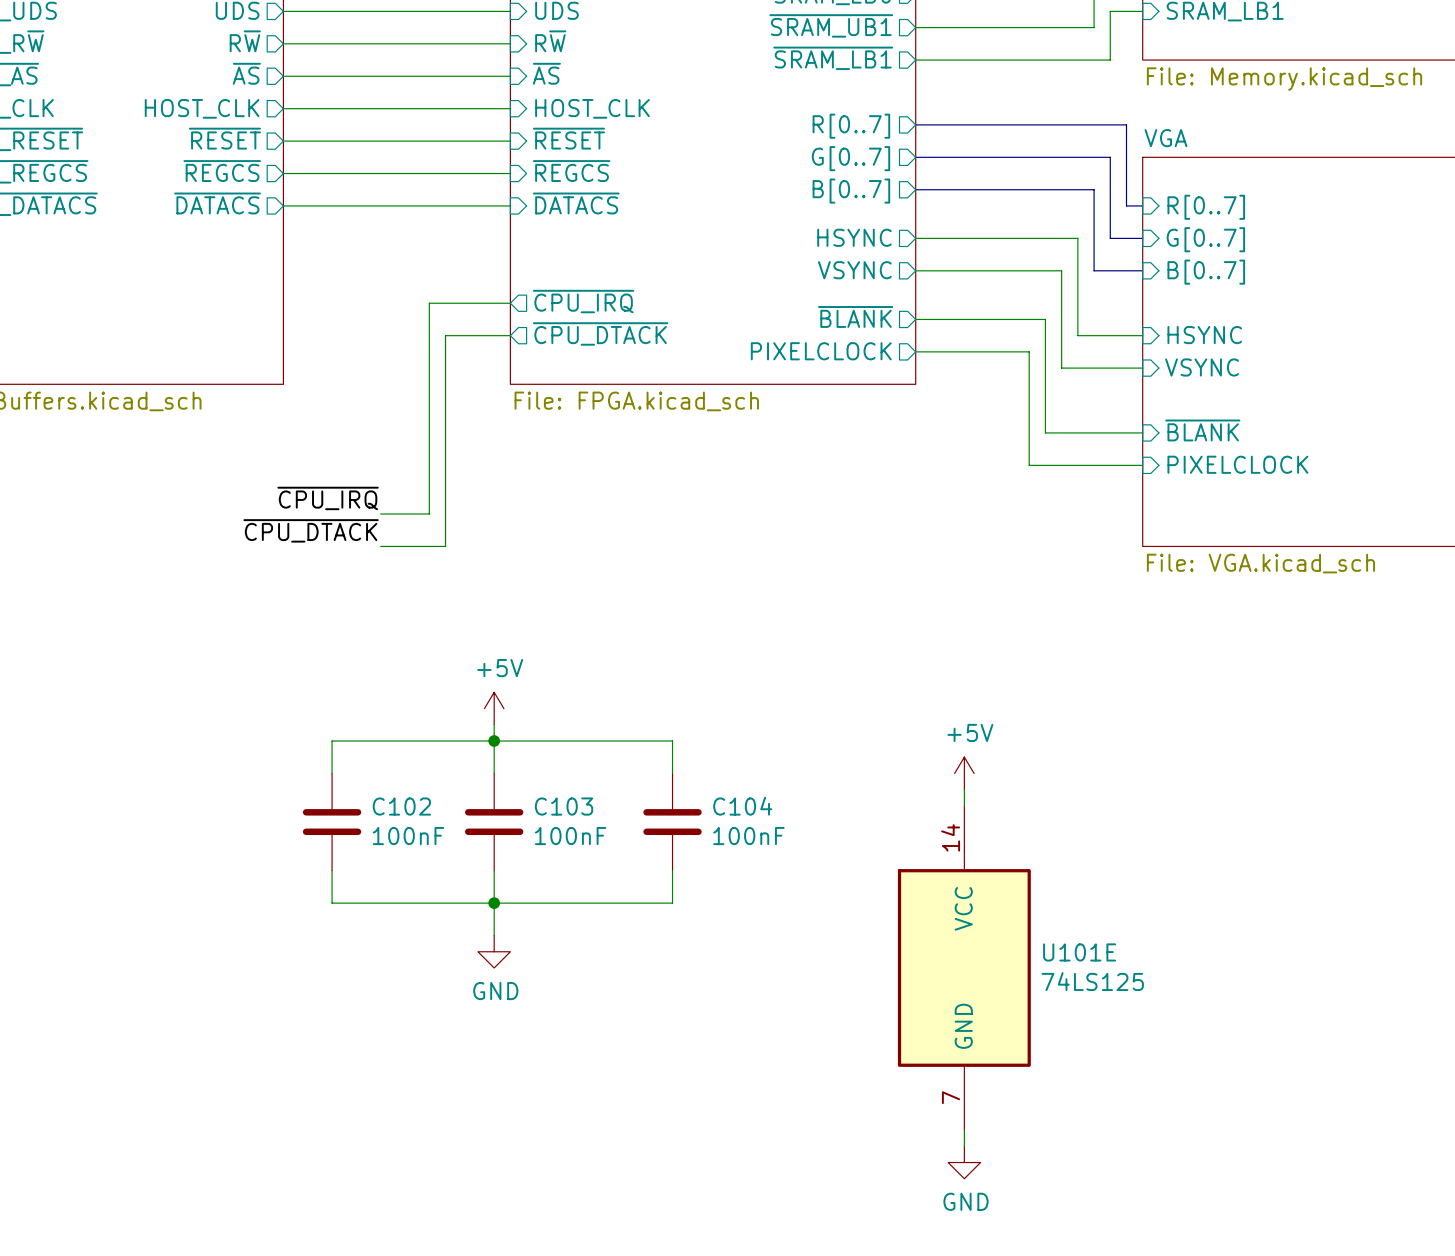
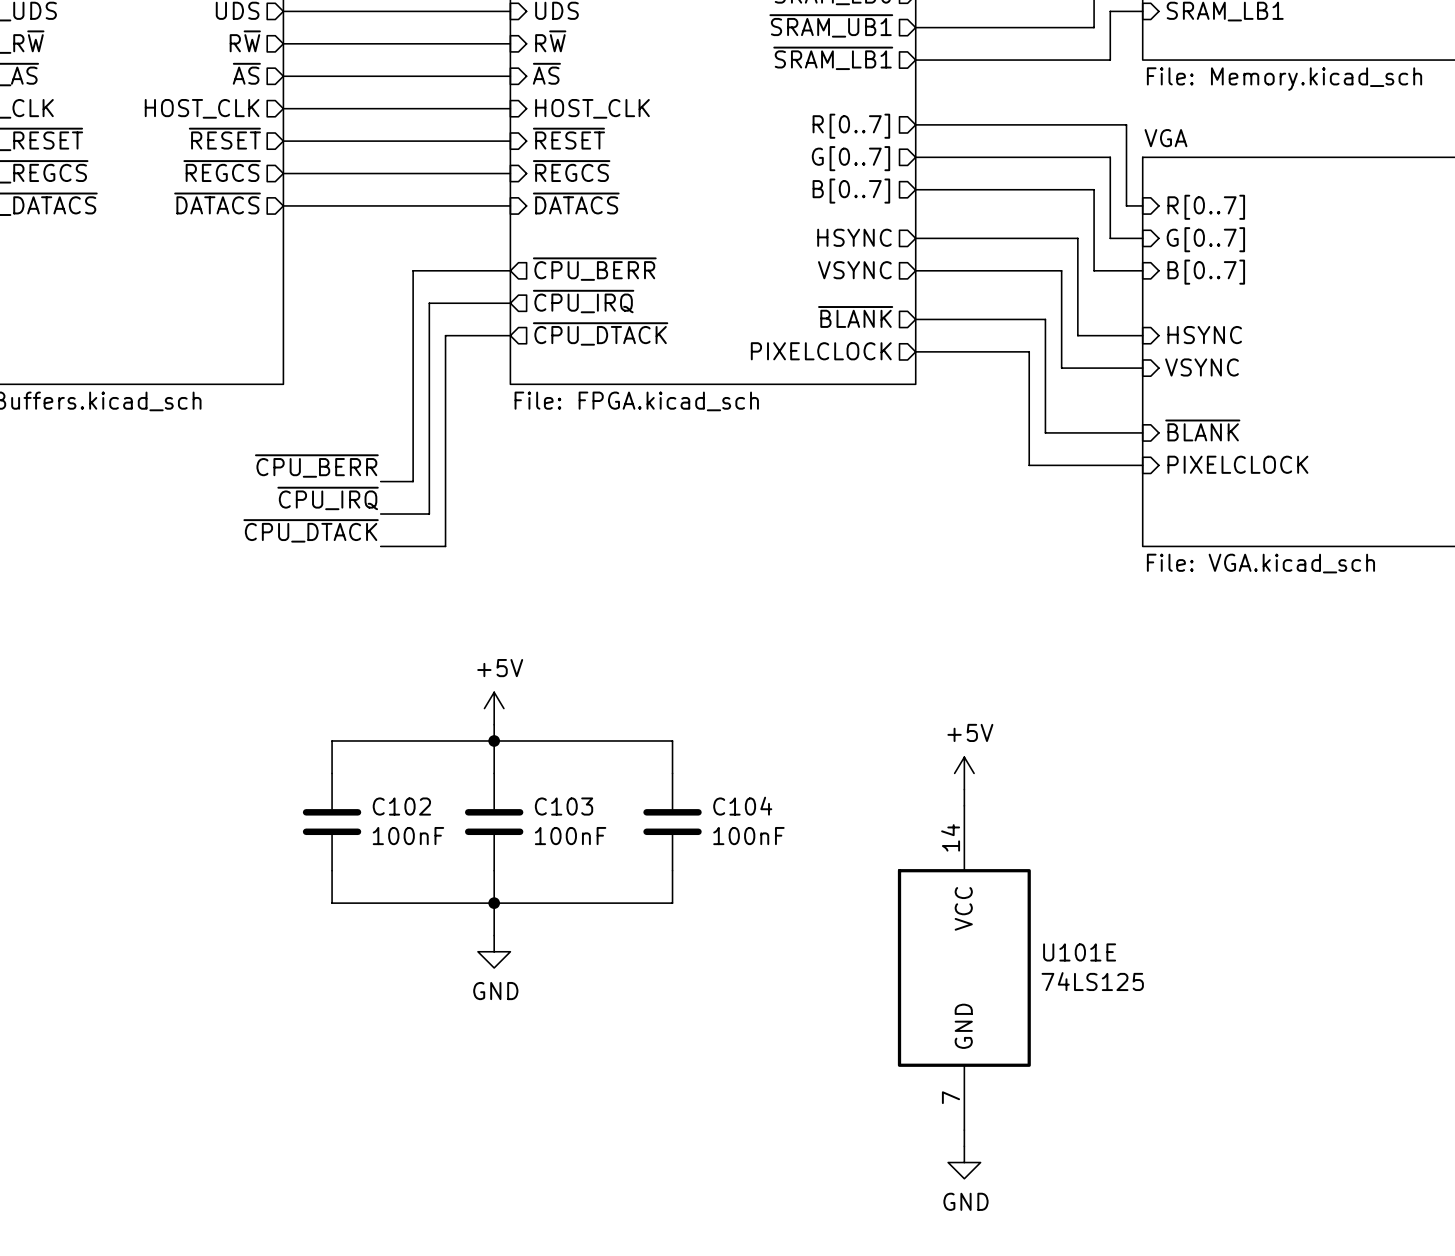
sheet pin: none -> ~{CPU_BERR} (594, 269)
wire: none -> (510, 270) (413, 270) (413, 481) (380, 481)
label: none -> ~{CPU_BERR} (316, 466)

